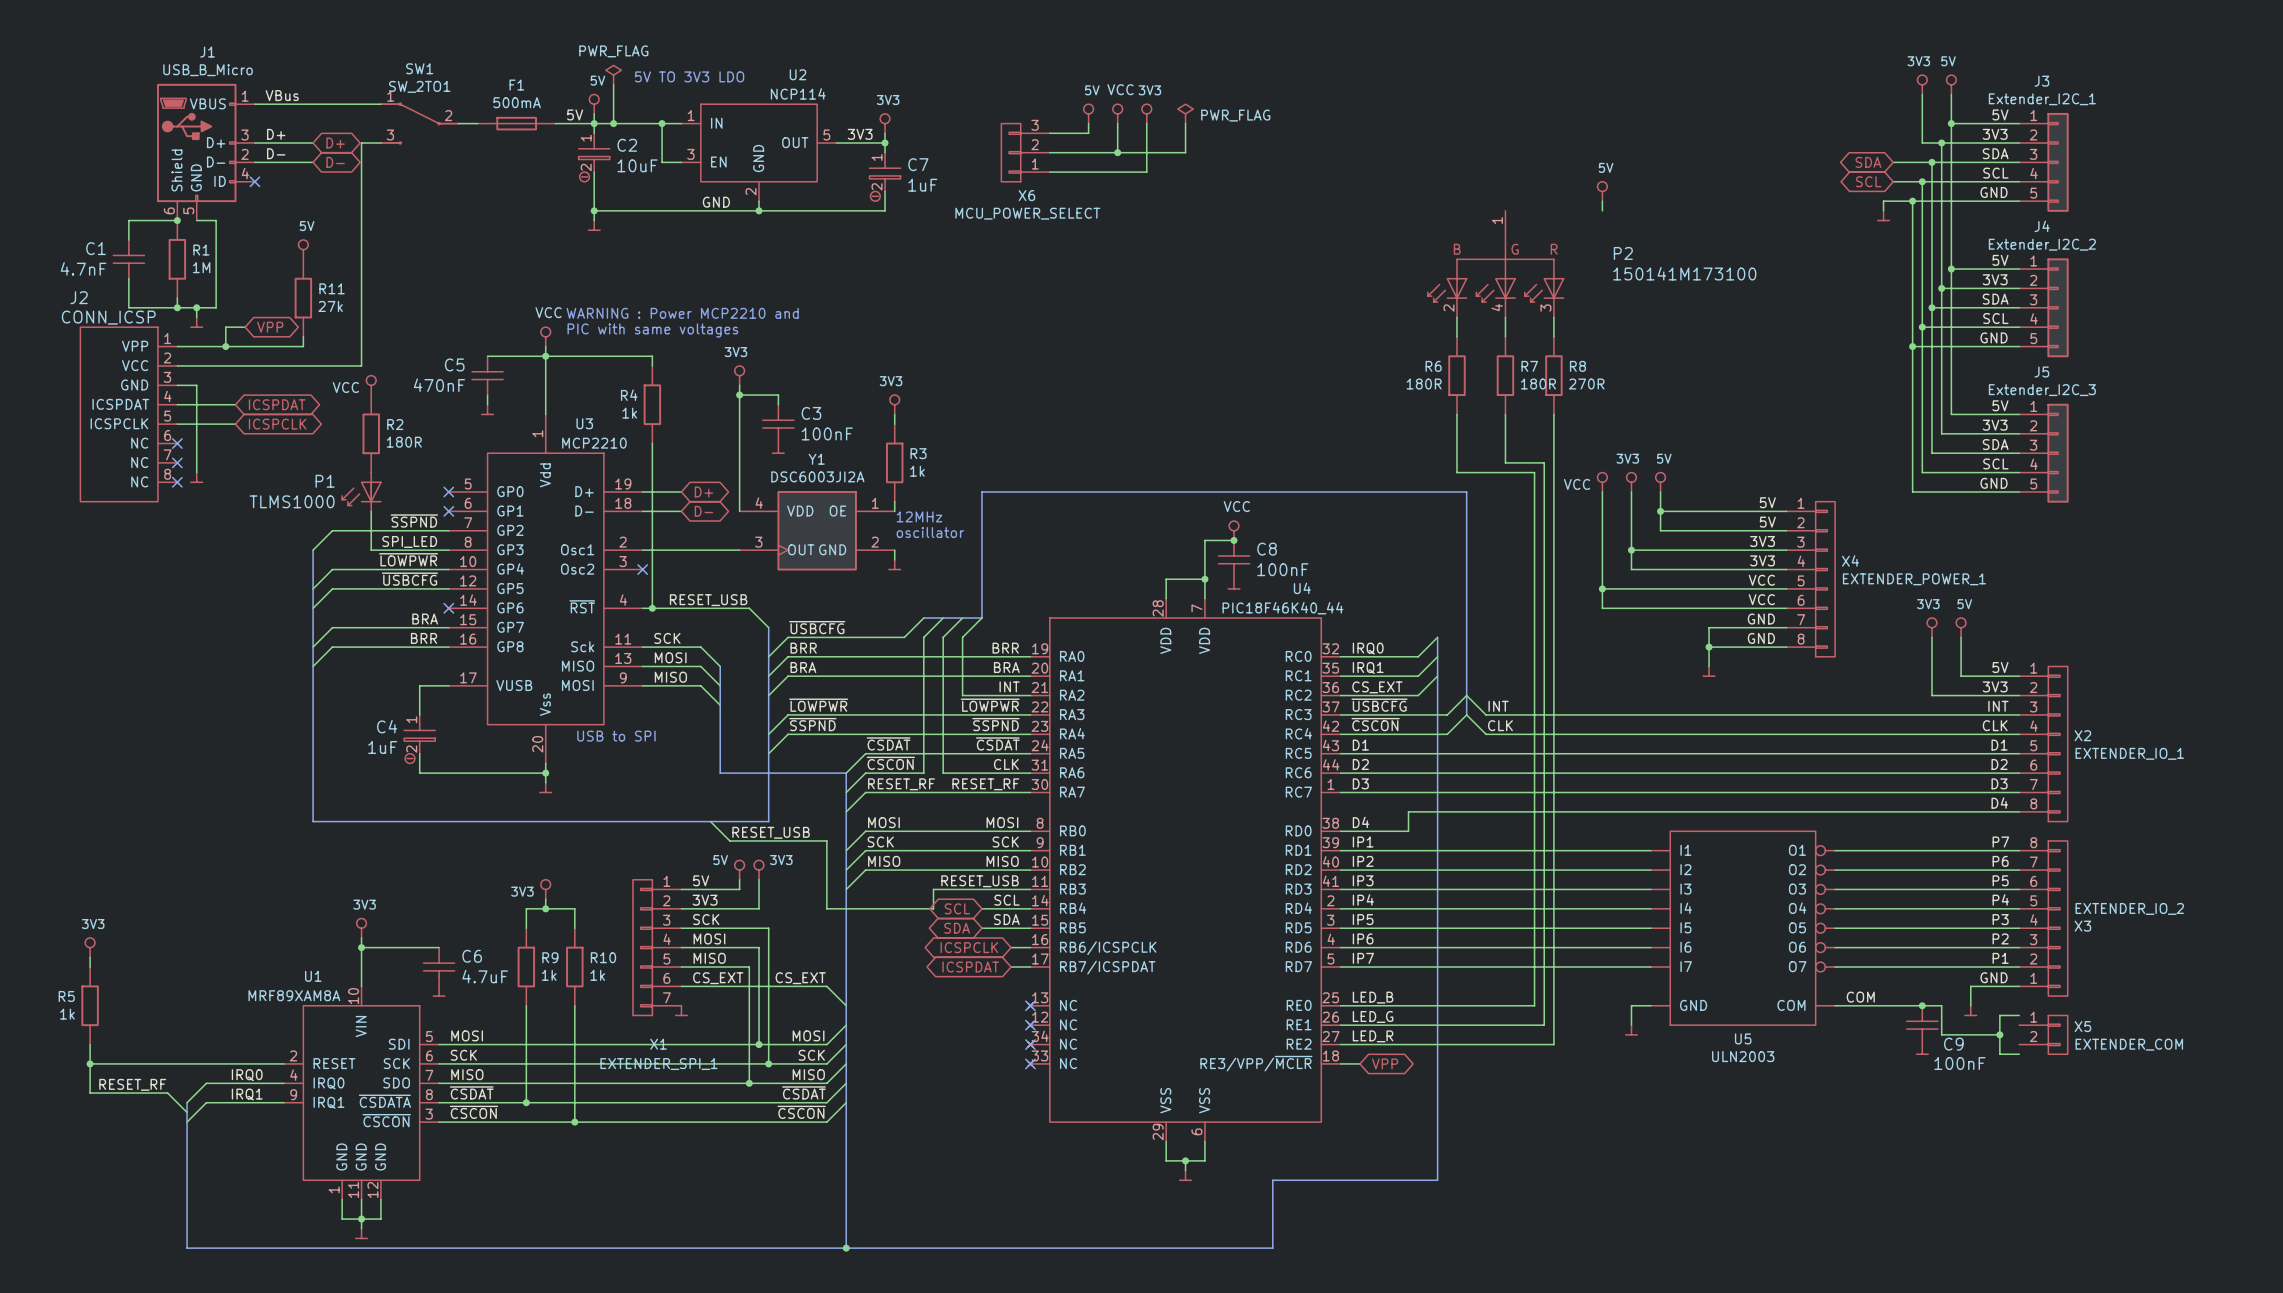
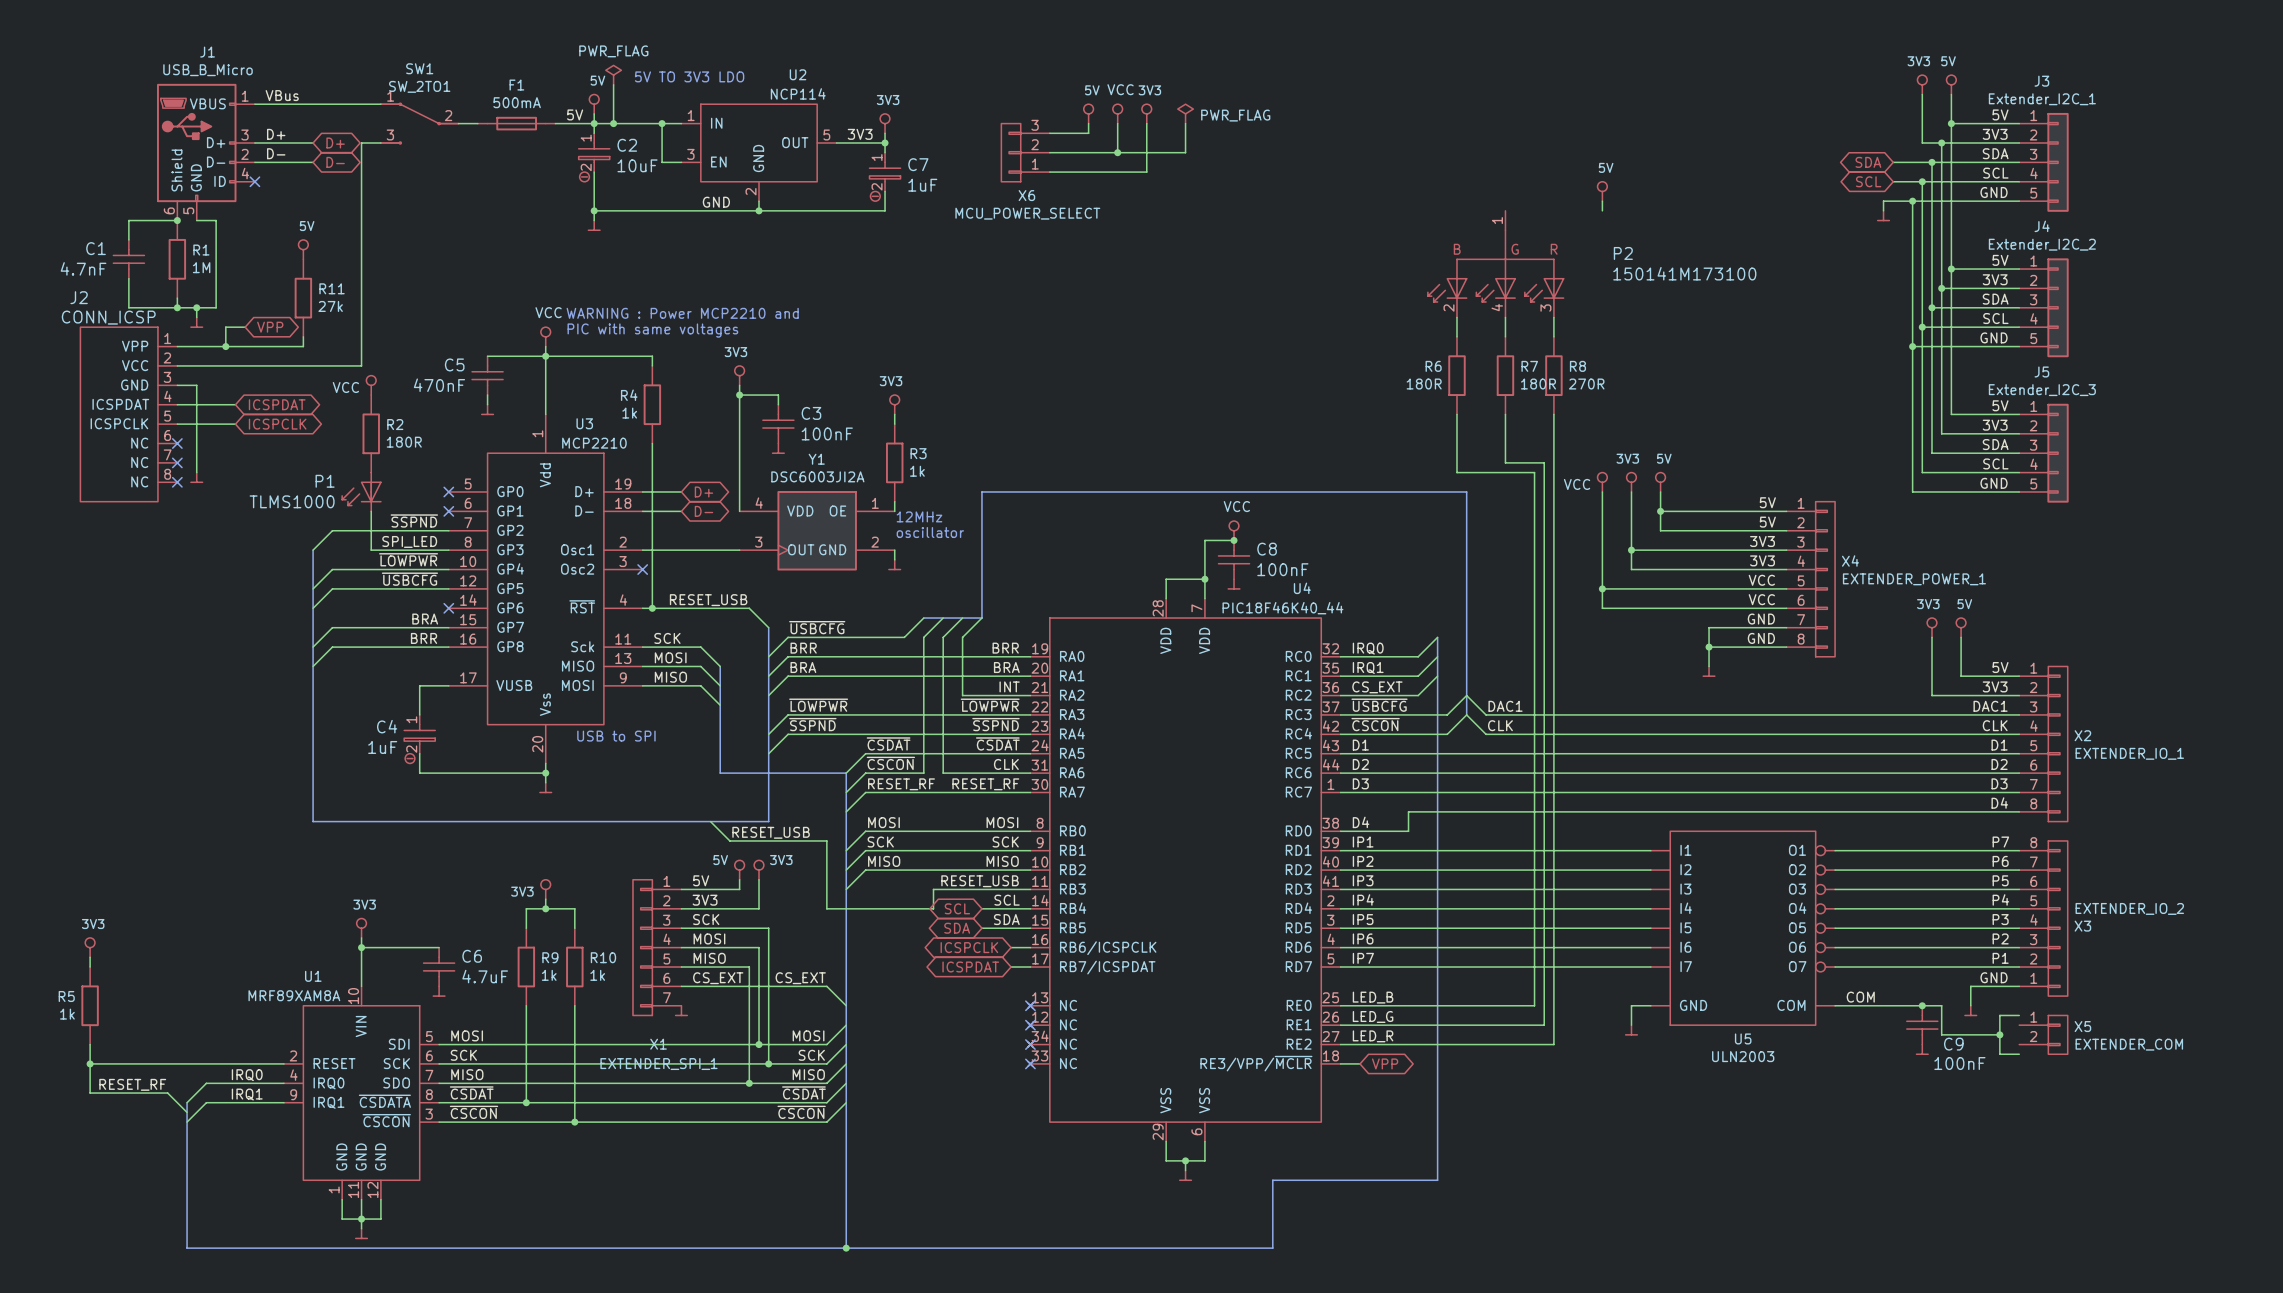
label: INT (1498, 706) -> DAC1 (1505, 706)
label: INT (1998, 706) -> DAC1 (1990, 706)

